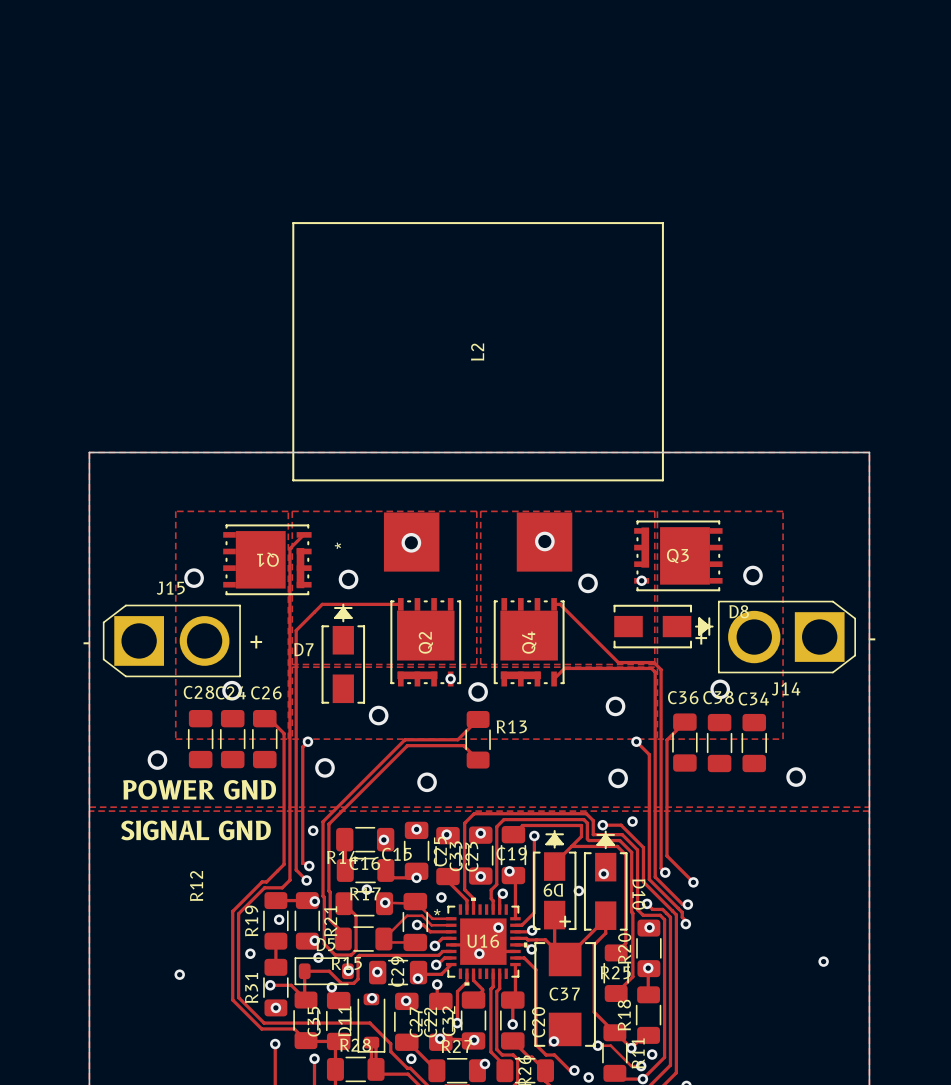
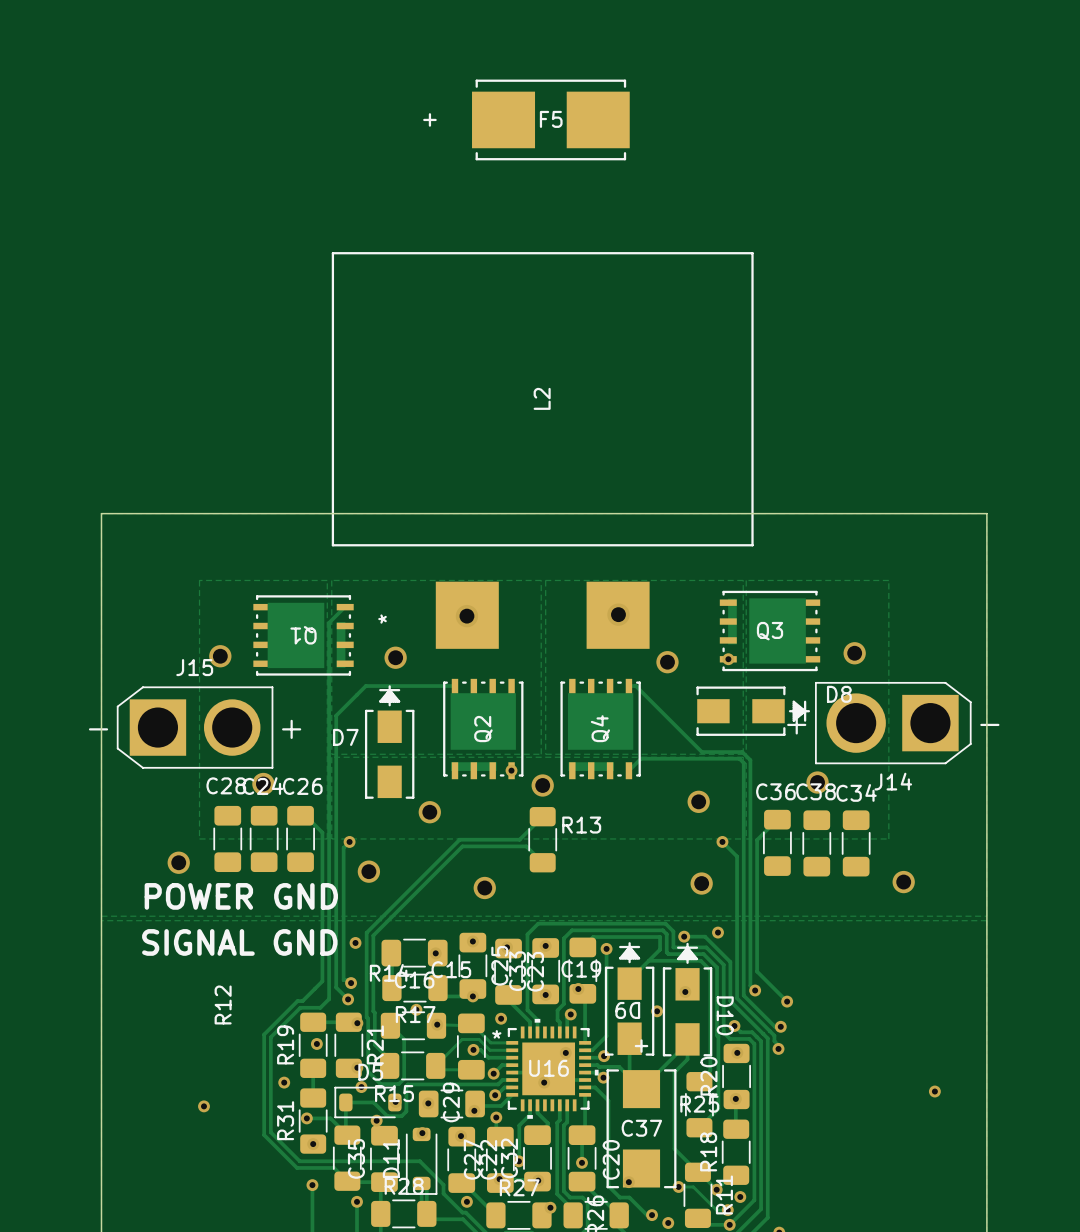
F5: none -> (526, 119)

